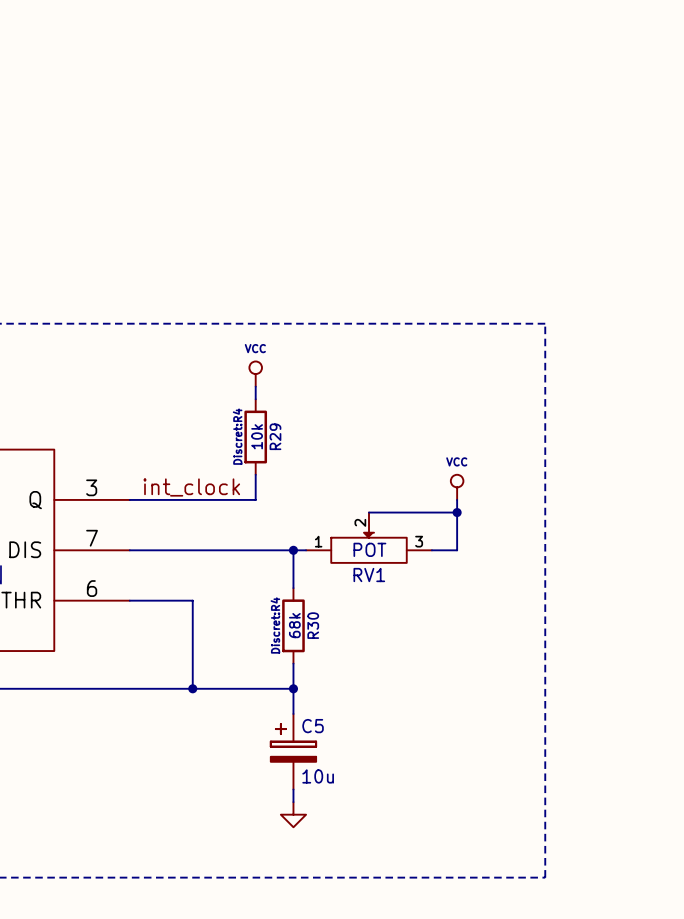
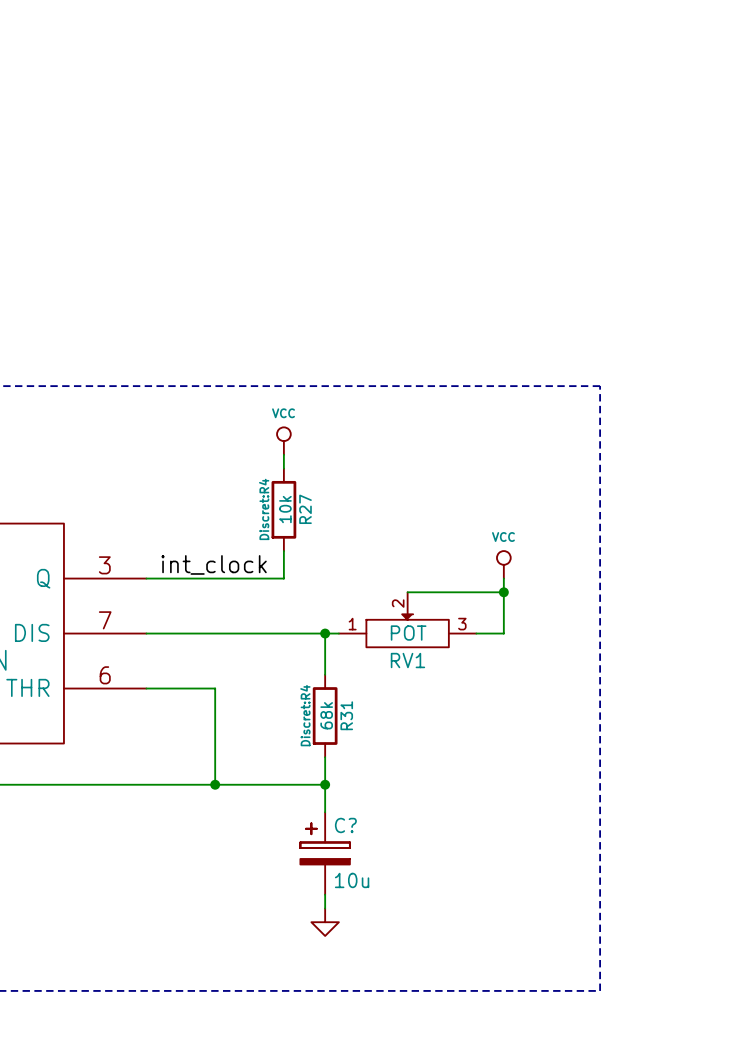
R29 name: R29 (275, 436) -> R27 (305, 509)
R30 name: R30 (313, 625) -> R31 (346, 715)
C5 name: C5 (313, 726) -> C? (345, 825)

